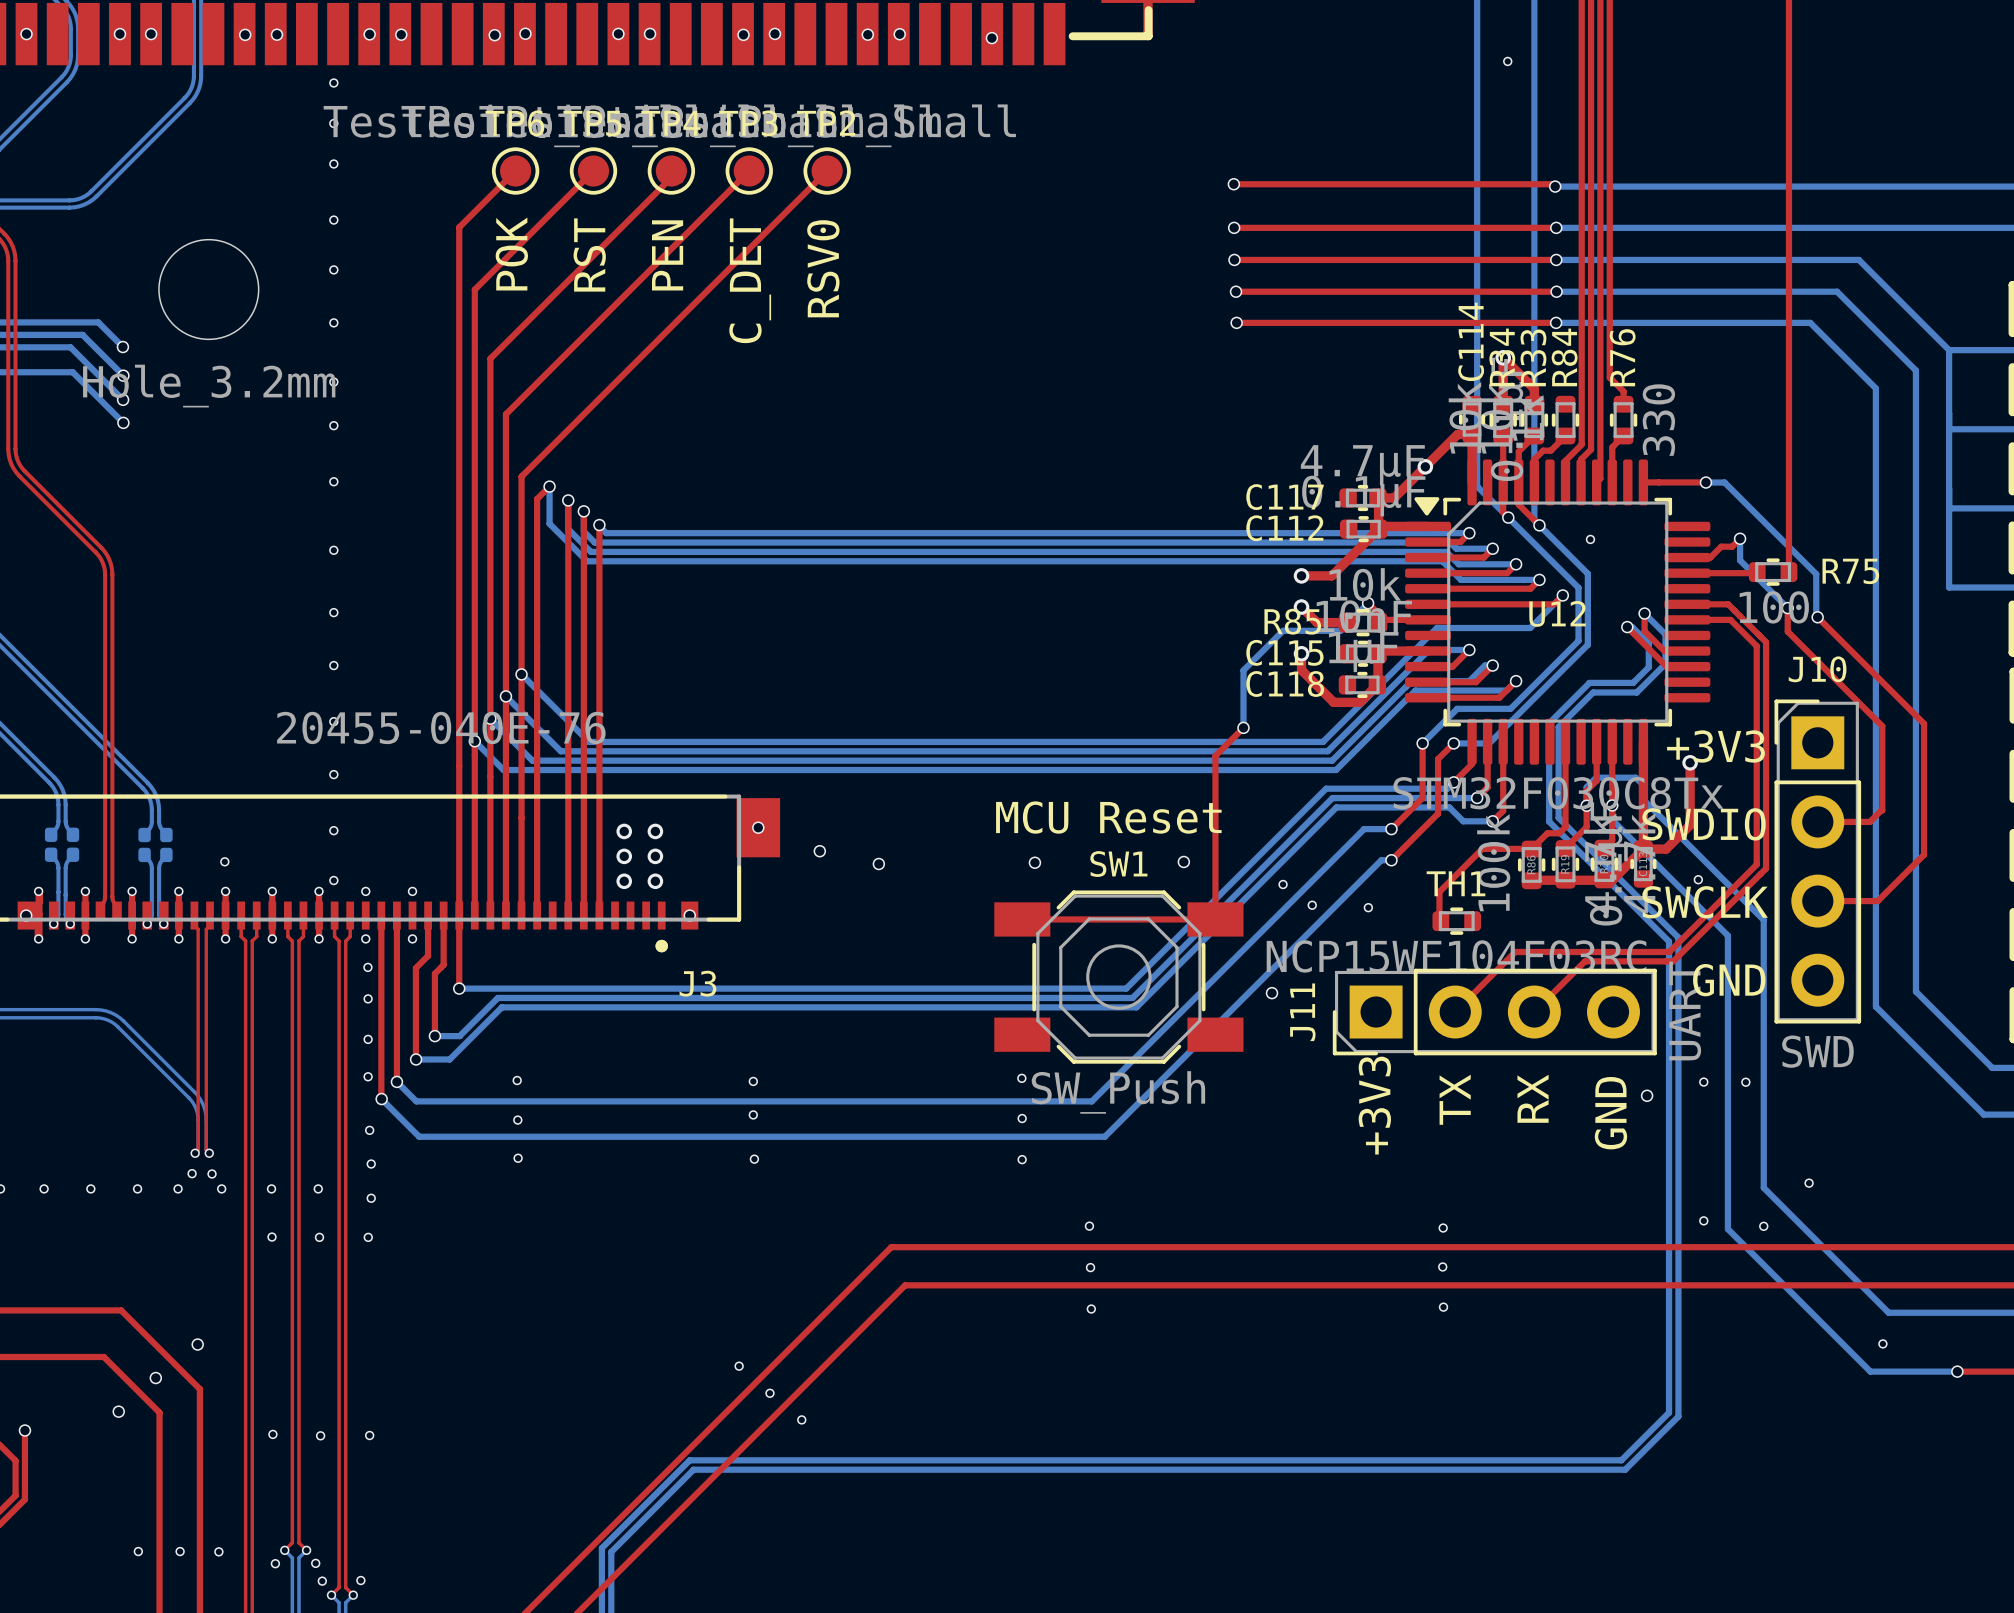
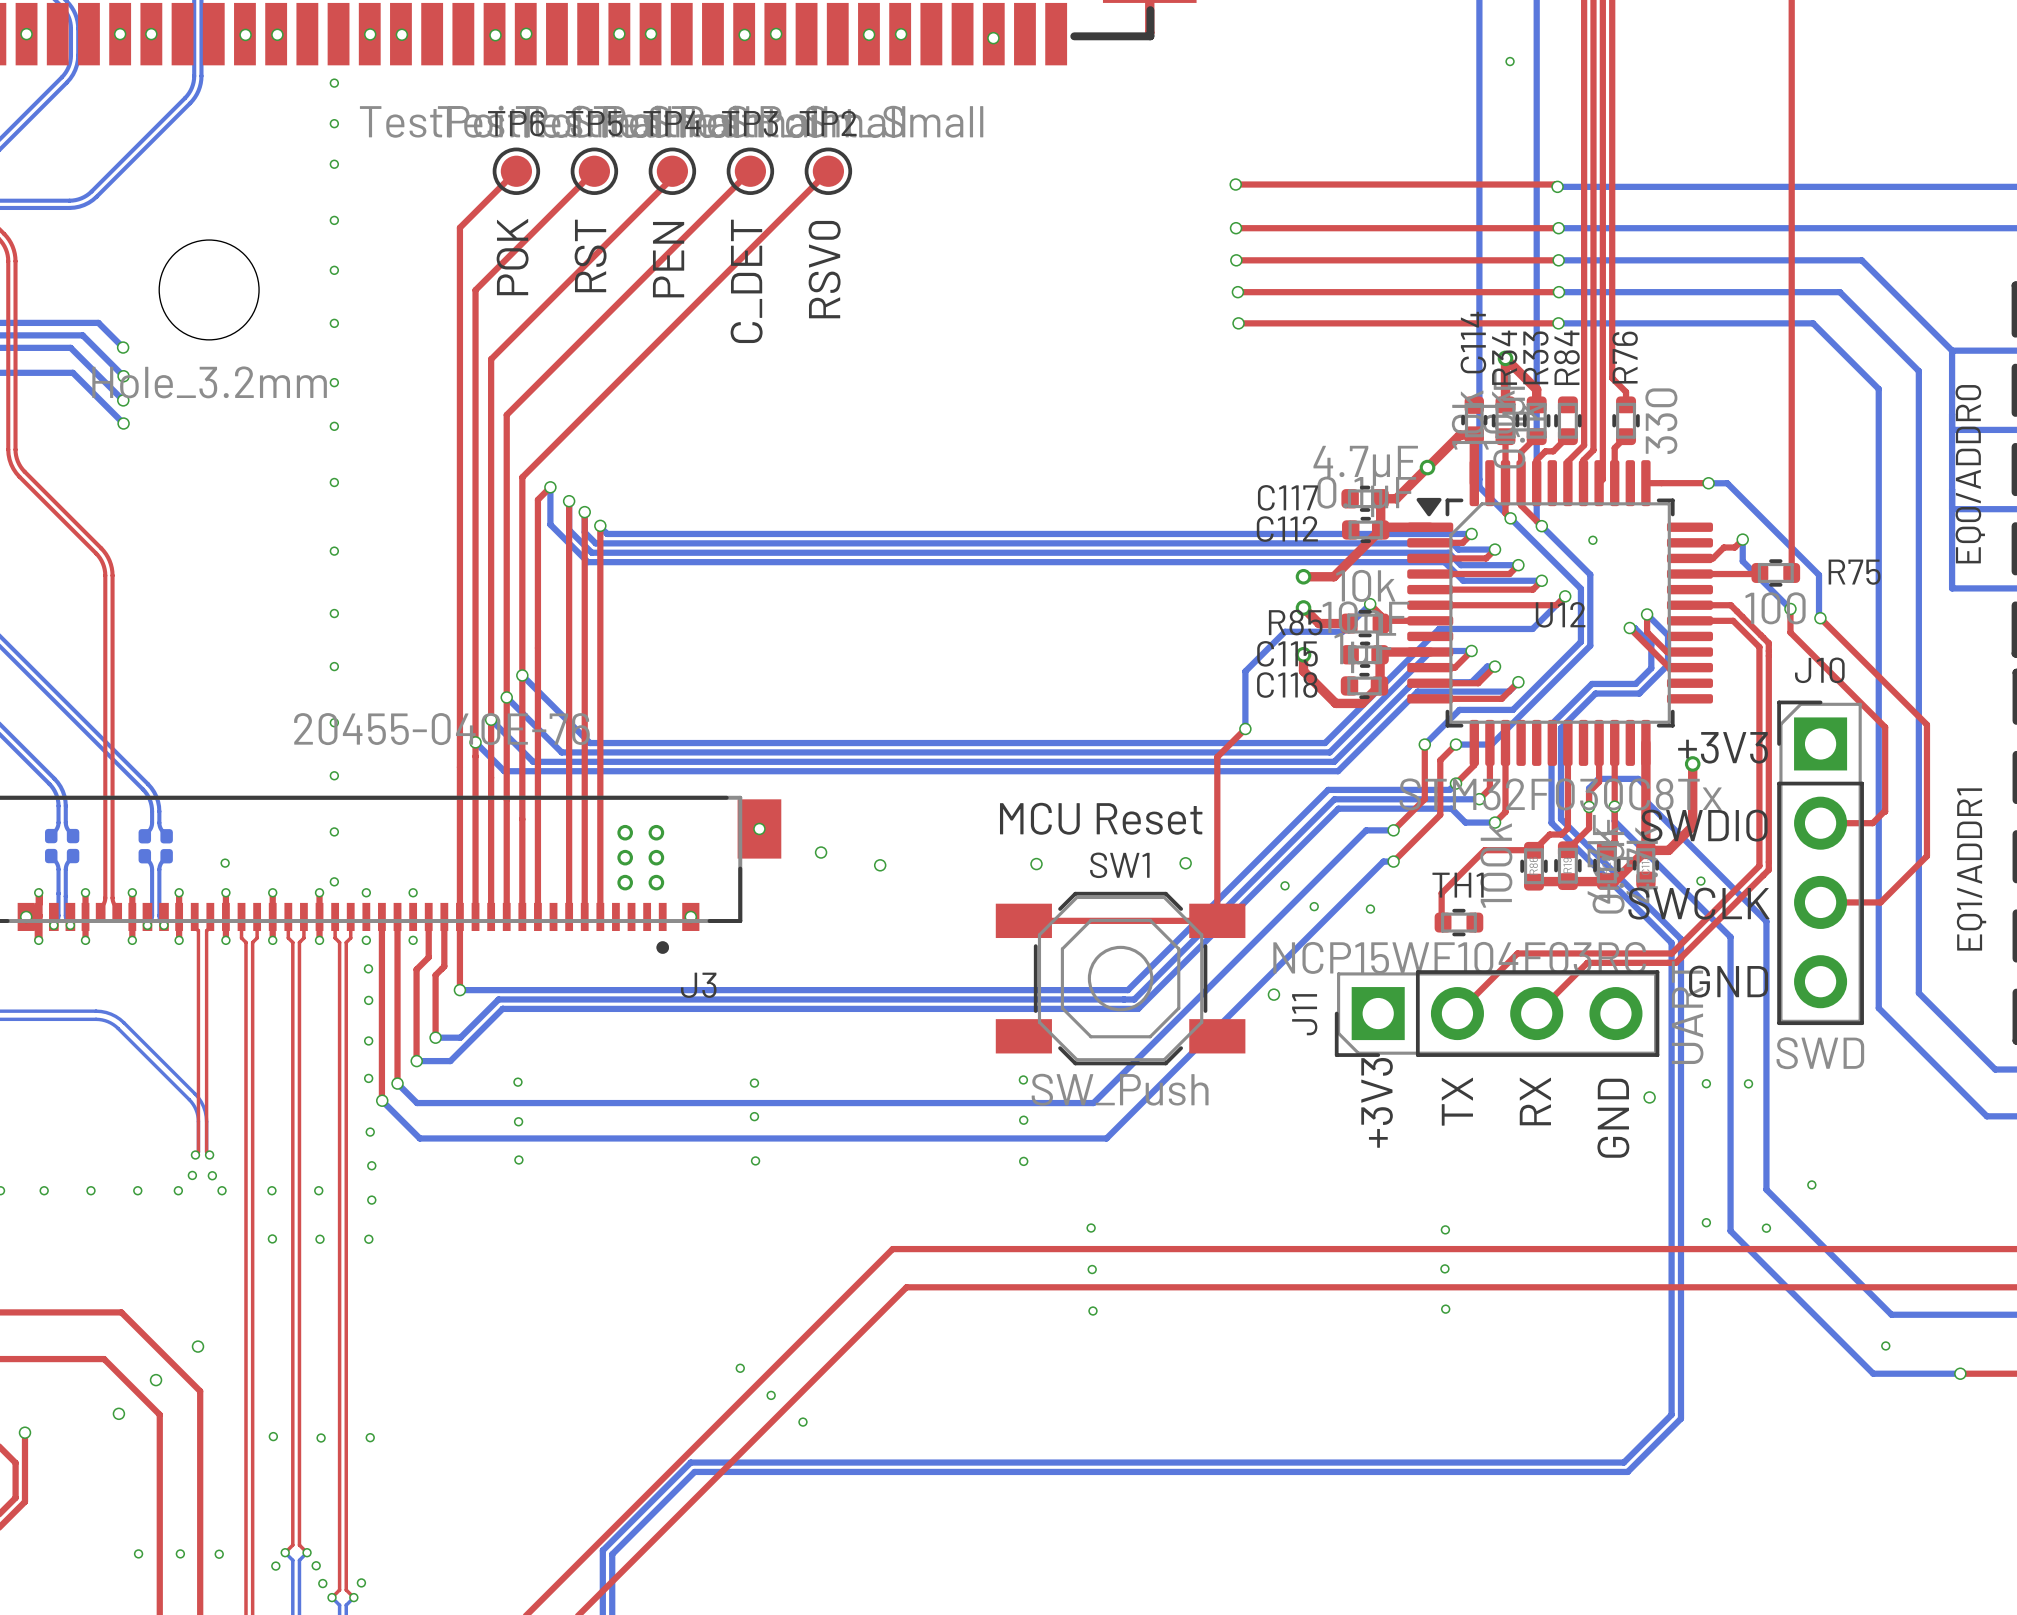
text: none -> EQ0/ADDR0 (1970, 474)
text: none -> EQ1/ADDR1 (1971, 869)

